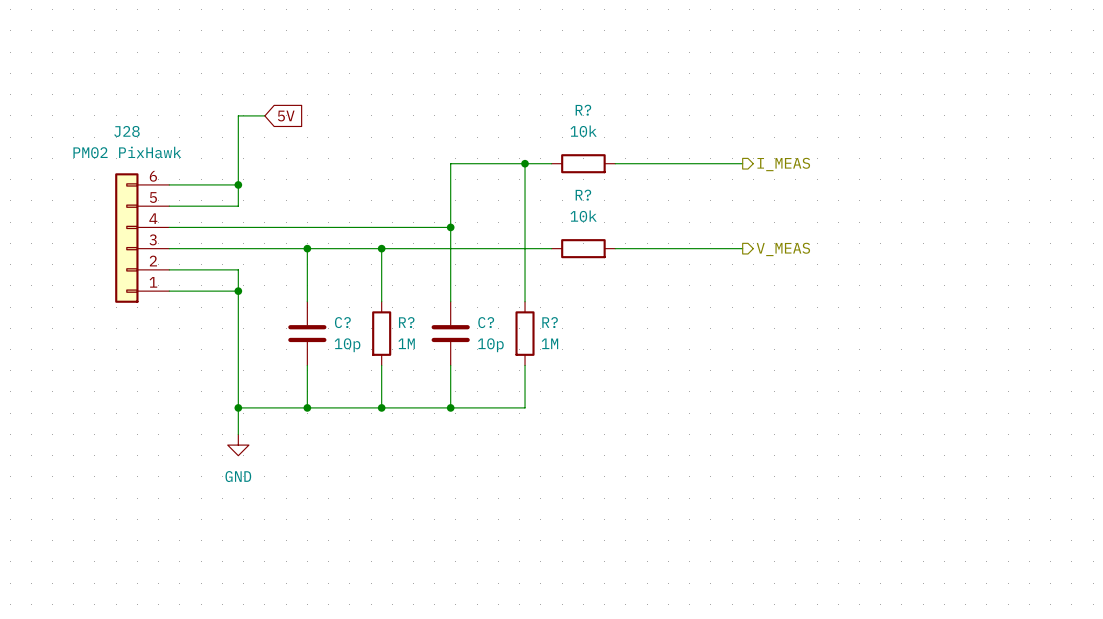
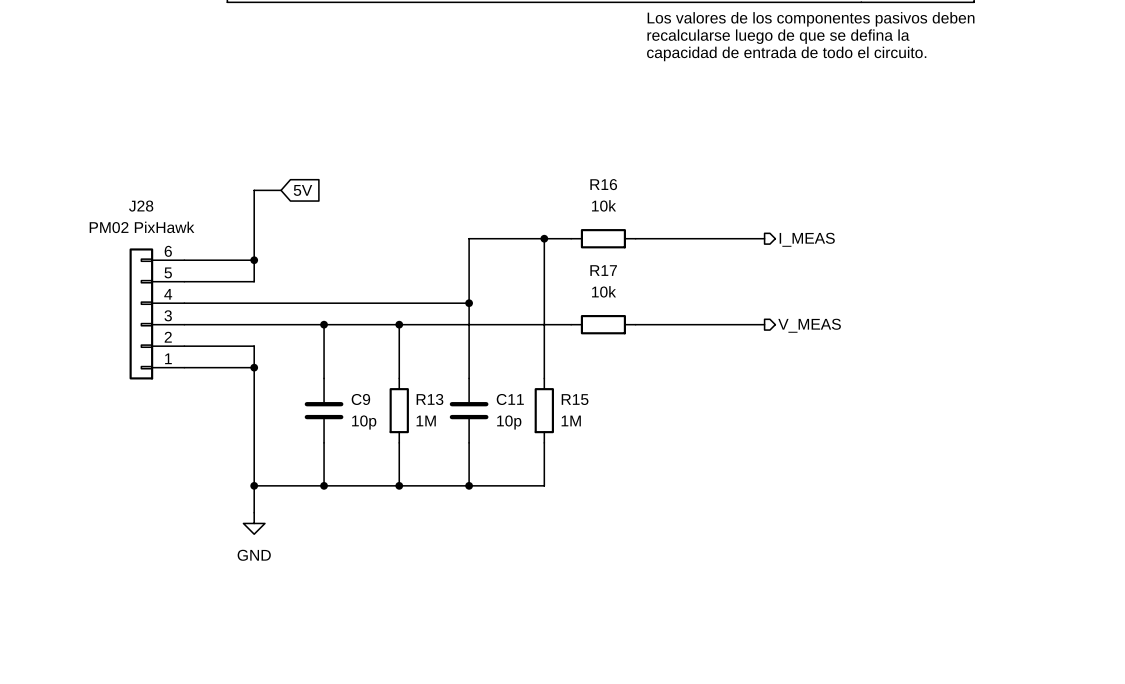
R? name: R? (583, 110) -> R16 (603, 184)
R? name: R? (583, 195) -> R17 (603, 270)
C? name: C? (342, 322) -> C9 (360, 399)
R? name: R? (406, 322) -> R13 (430, 399)
C? name: C? (486, 322) -> C11 (510, 399)
R? name: R? (550, 322) -> R15 (575, 399)

